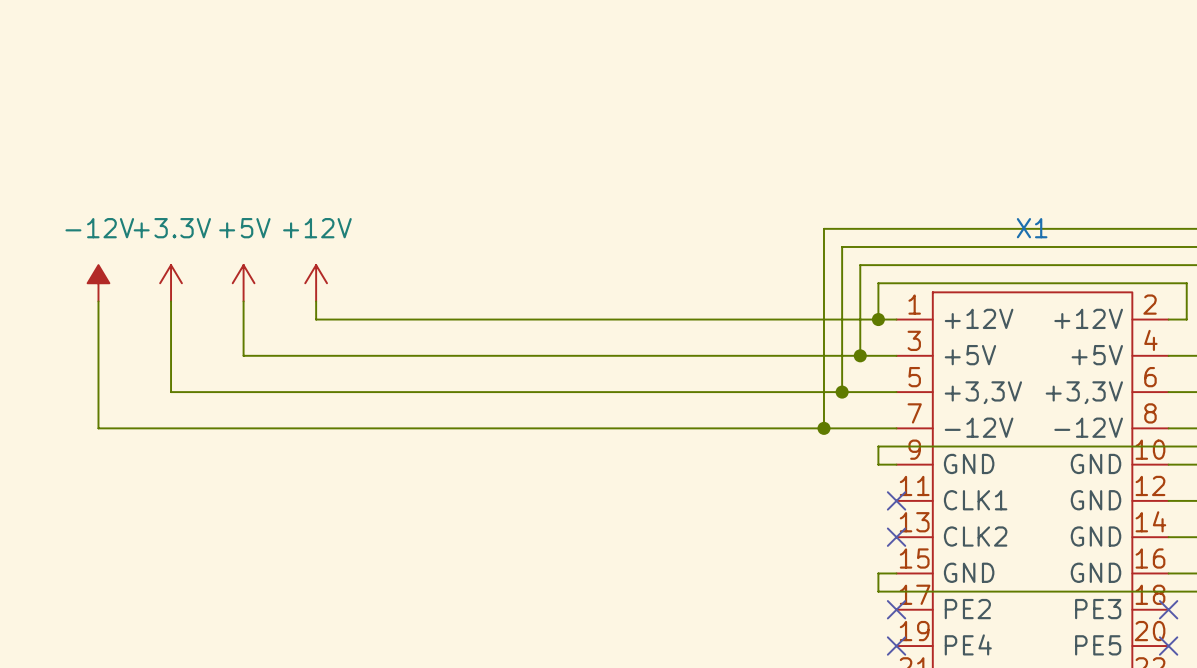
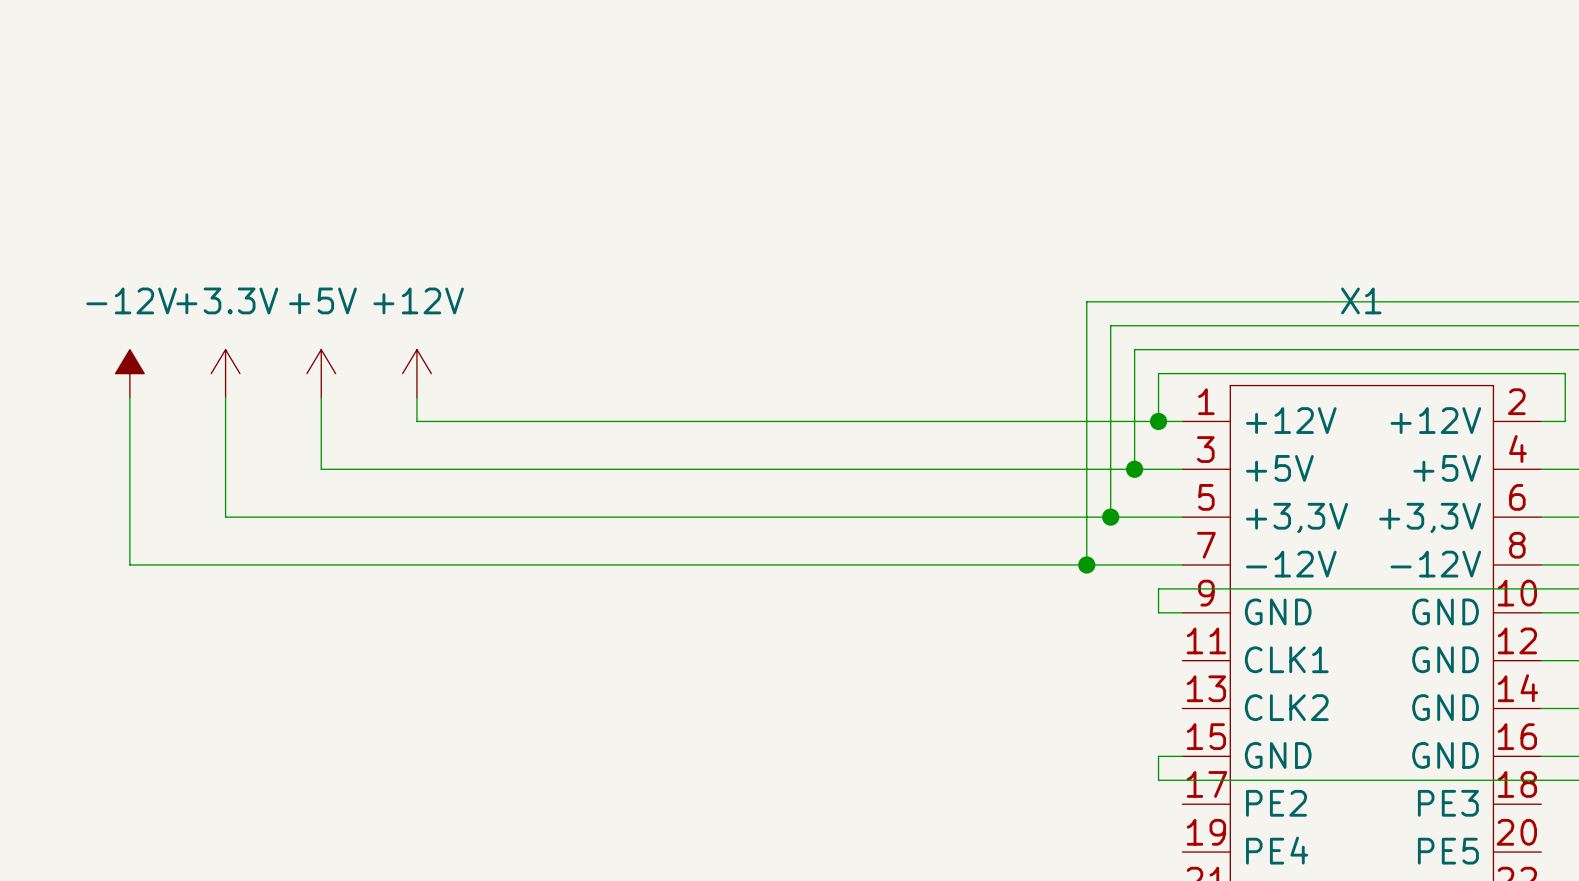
no-connect mark: (896, 500) -> none
no-connect mark: (896, 537) -> none
no-connect mark: (896, 609) -> none
no-connect mark: (1168, 609) -> none
no-connect mark: (896, 646) -> none
no-connect mark: (1168, 646) -> none

